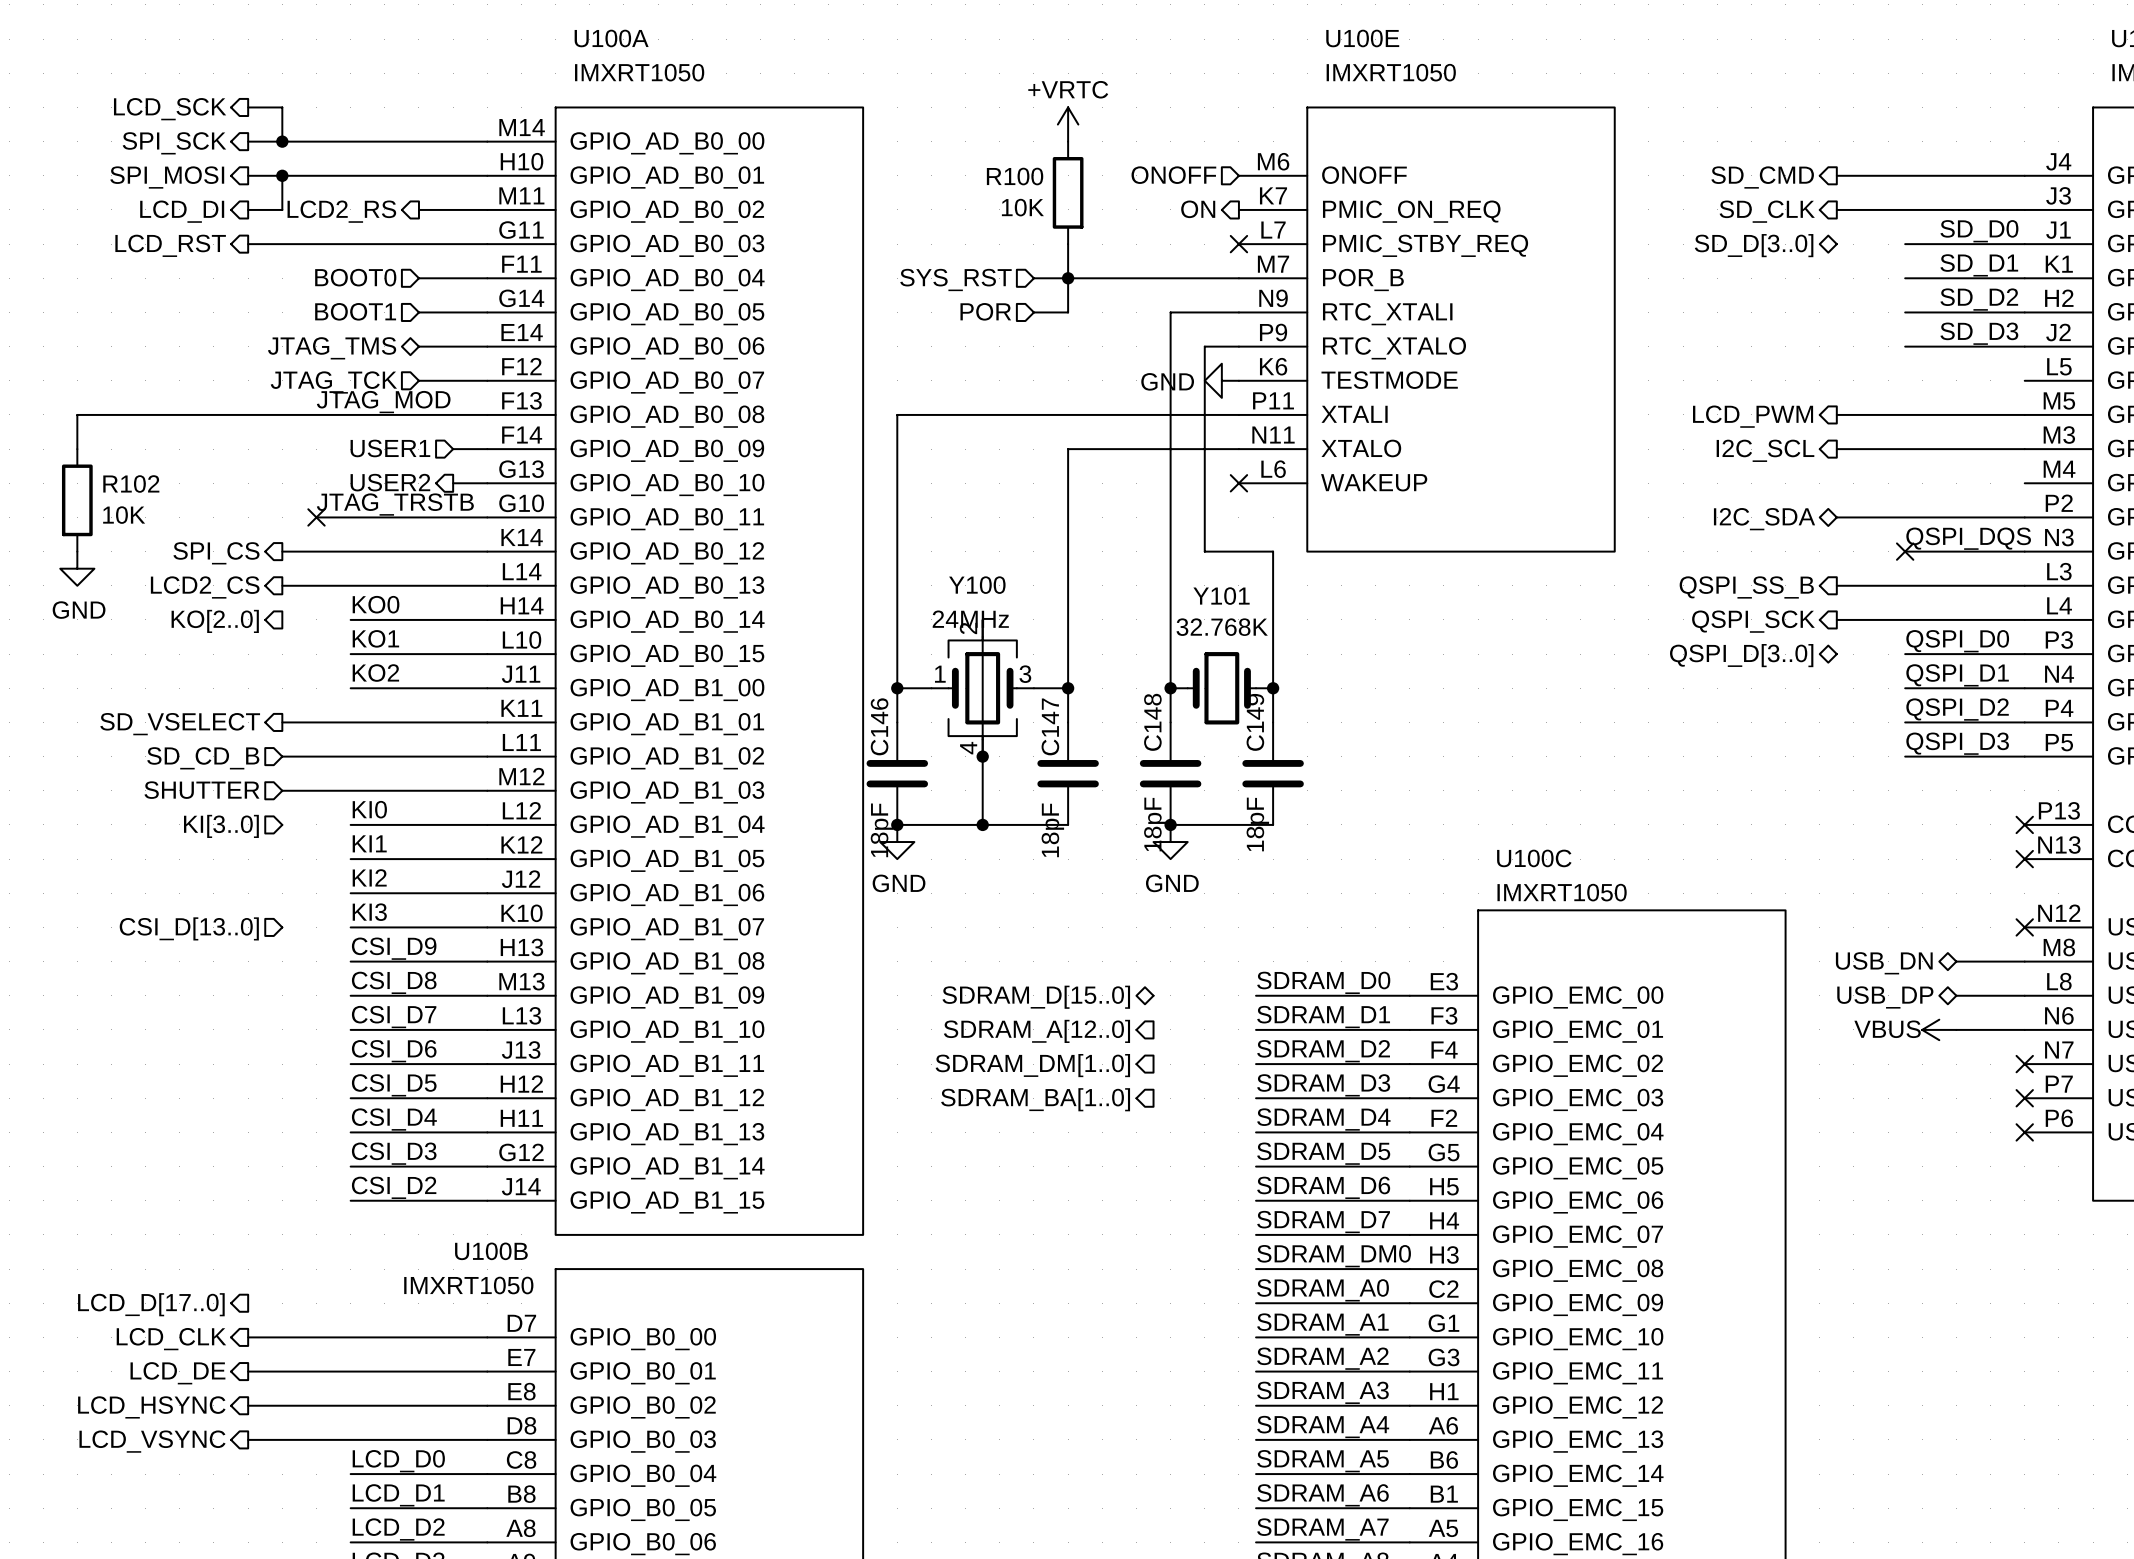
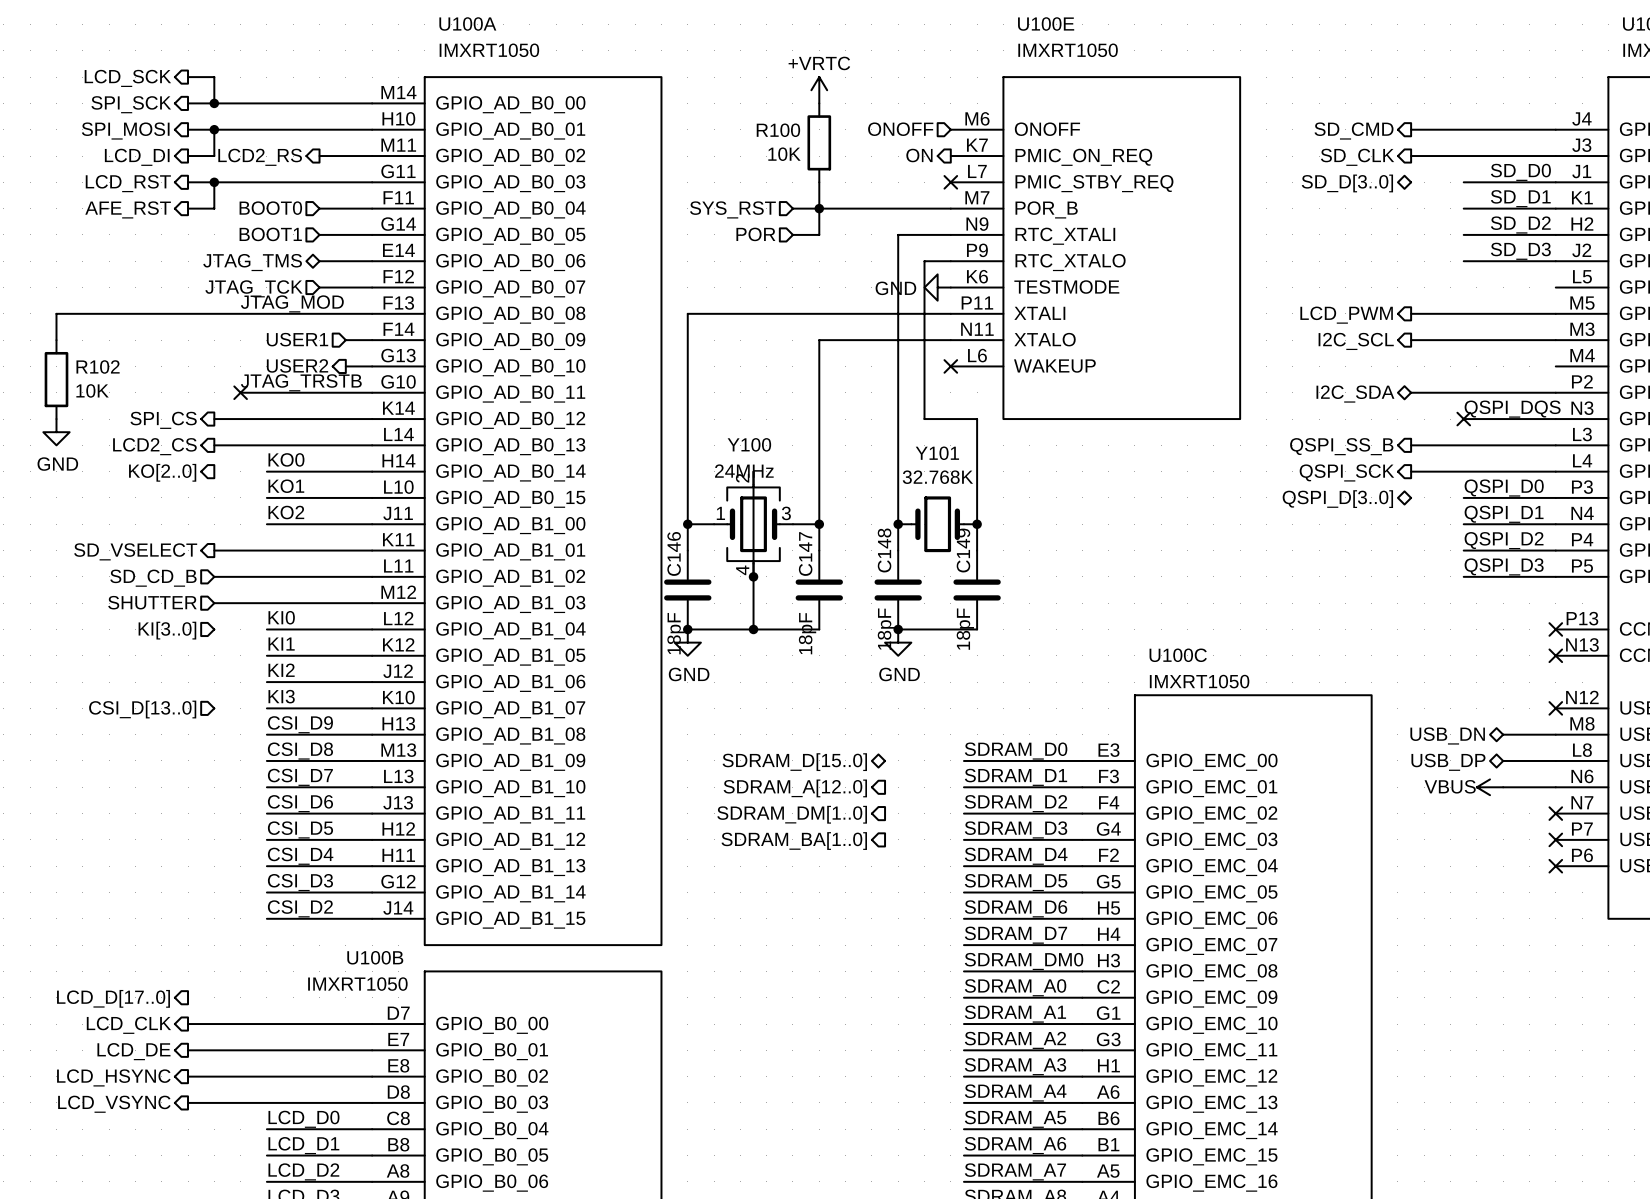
wire: none -> (214, 182) (214, 208) (188, 208)
junction: none -> (214, 182)
hierarchical label: none -> AFE_RST (128, 209)

